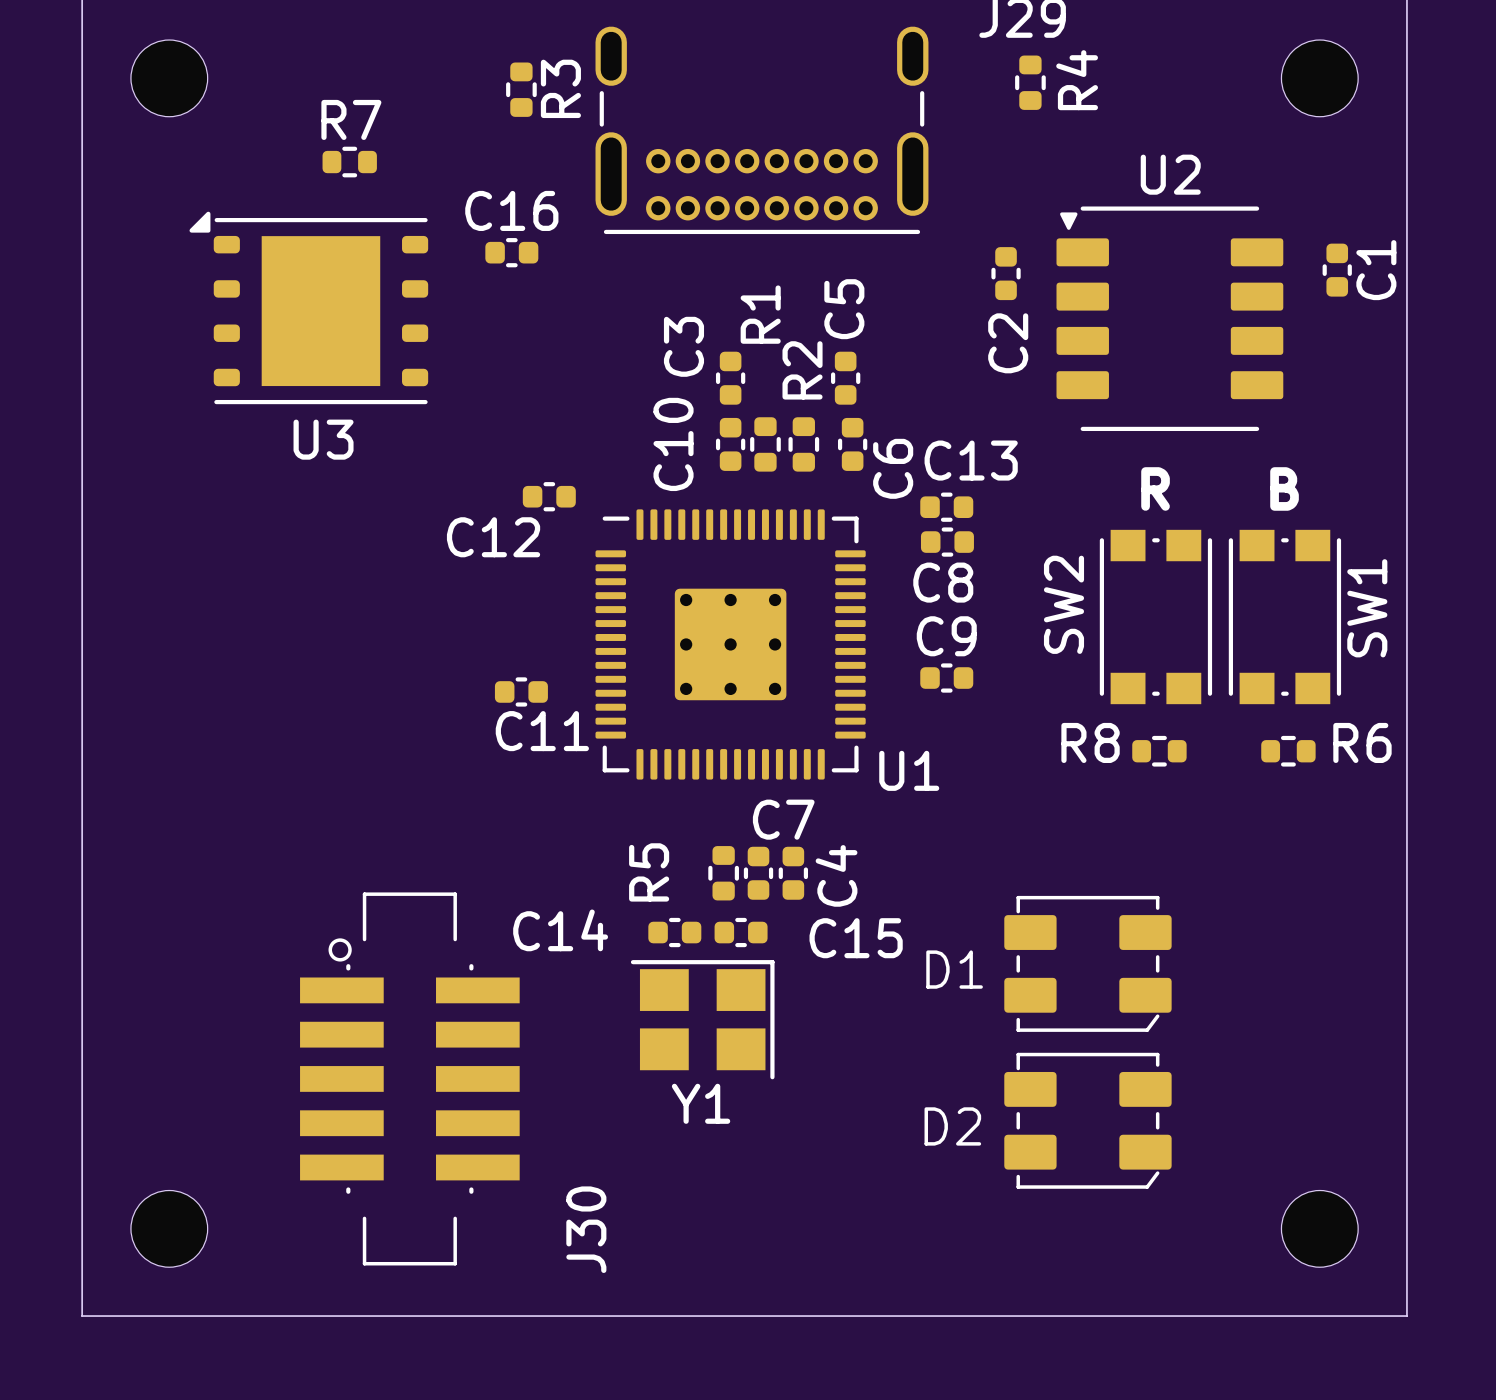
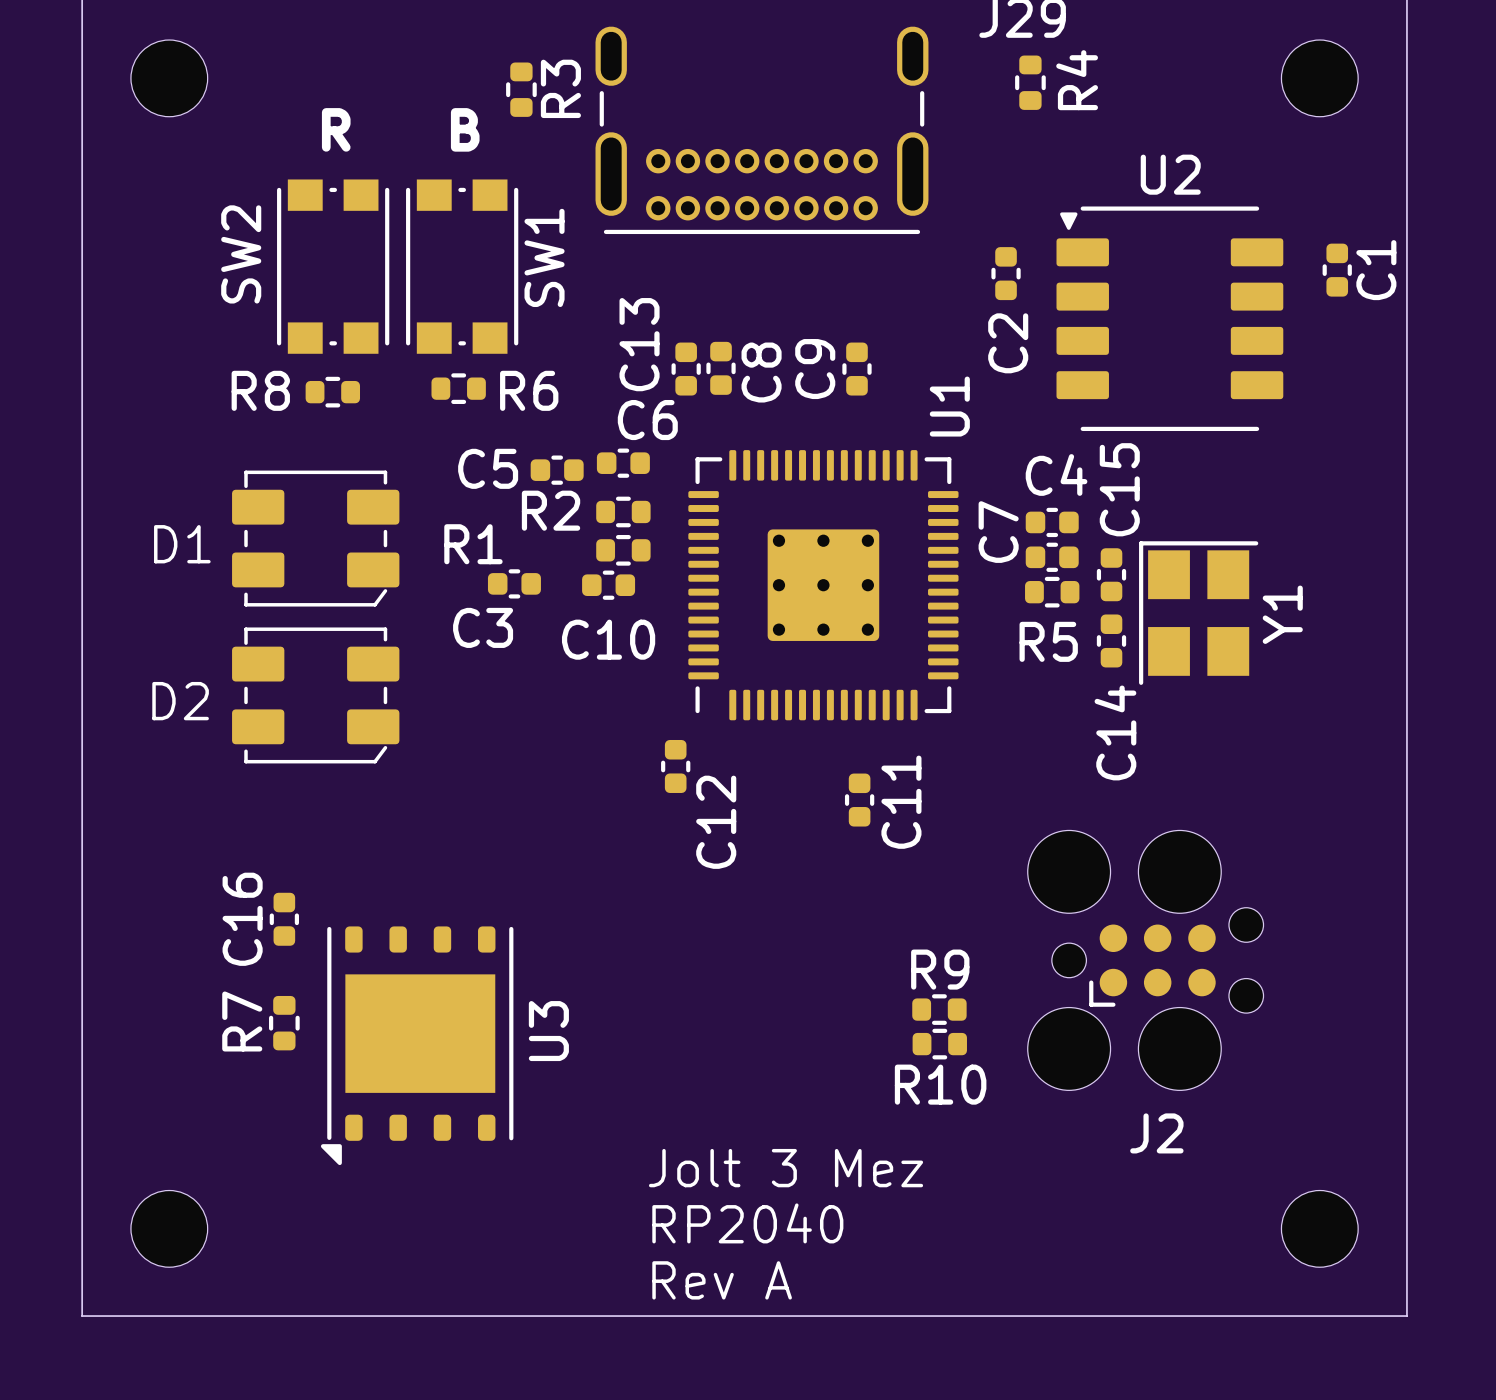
text: none -> R (336, 129)
text: none -> B (465, 129)
R7 rotation: 0° (349, 162) -> 90° clockwise (284, 1023)
R7 position: (349, 162) -> (284, 1023)
C16 rotation: 0° (511, 252) -> 90° clockwise (284, 919)
C16 position: (511, 252) -> (284, 919)
U3 rotation: 0° (308, 307) -> 90° counterclockwise (417, 1045)
U3 position: (308, 307) -> (417, 1045)
C5 name position: C5 (844, 309) -> C5 (488, 468)
R1 name position: R1 (760, 314) -> R1 (473, 544)
C3 name position: C3 (683, 346) -> C3 (483, 627)
R2 name position: R2 (802, 370) -> R2 (551, 510)
C3 rotation: 0° (730, 378) -> 90° clockwise (514, 583)
C3 position: (730, 378) -> (514, 583)
C5 rotation: 0° (845, 378) -> 90° clockwise (557, 470)
C5 position: (845, 378) -> (557, 470)
C10 name position: C10 (673, 444) -> C10 (608, 639)
C10 rotation: 0° (730, 444) -> 90° clockwise (608, 585)
C10 position: (730, 444) -> (608, 585)
R1 rotation: 0° (765, 444) -> 90° clockwise (623, 550)
R1 position: (765, 444) -> (623, 550)
R2 rotation: 0° (803, 444) -> 90° clockwise (623, 511)
R2 position: (803, 444) -> (623, 511)
C6 rotation: 0° (852, 444) -> 90° clockwise (623, 463)
C6 position: (852, 444) -> (623, 463)
C13 name position: C13 (971, 460) -> C13 (639, 344)
text: R (1155, 488) -> none
text: B (1284, 488) -> none
C12 rotation: 0° (549, 496) -> 90° clockwise (675, 766)
C12 position: (549, 496) -> (675, 766)
C13 rotation: 0° (946, 507) -> 90° clockwise (686, 369)
C13 position: (946, 507) -> (686, 369)
C12 name position: C12 (493, 537) -> C12 (716, 822)
C8 rotation: 0° (947, 542) -> 90° clockwise (721, 368)
C8 position: (947, 542) -> (721, 368)
SW2 position: (1155, 617) -> (333, 266)
SW1 position: (1284, 617) -> (462, 266)
U1 rotation: 0° (730, 644) -> 90° counterclockwise (823, 585)
C9 rotation: 0° (946, 678) -> 90° clockwise (856, 369)
C9 position: (946, 678) -> (856, 369)
C11 rotation: 0° (521, 691) -> 90° clockwise (859, 800)
C11 position: (521, 691) -> (859, 800)
R8 name position: R8 (1090, 742) -> R8 (260, 390)
R6 name position: R6 (1362, 742) -> R6 (529, 390)
R8 position: (1159, 751) -> (332, 392)
R6 position: (1288, 751) -> (458, 388)
C7 name position: C7 (783, 819) -> C7 (998, 532)
R5 name position: R5 (649, 872) -> R5 (1048, 641)
R5 rotation: 0° (723, 873) -> 90° clockwise (1052, 592)
R5 position: (723, 873) -> (1052, 592)
C7 rotation: 0° (758, 873) -> 90° clockwise (1052, 557)
C7 position: (758, 873) -> (1052, 557)
C4 rotation: 0° (793, 873) -> 90° clockwise (1052, 522)
C4 position: (793, 873) -> (1052, 522)
C14 name position: C14 (560, 930) -> C14 (1115, 732)
C14 rotation: 0° (674, 932) -> 90° clockwise (1111, 640)
C14 position: (674, 932) -> (1111, 640)
C15 rotation: 0° (741, 932) -> 90° clockwise (1111, 574)
C15 position: (741, 932) -> (1111, 574)
C15 name position: C15 (856, 938) -> C15 (1119, 489)
J2: none -> (1145, 960)
D1 position: (1087, 963) -> (315, 538)
R9: none -> (939, 1009)
Y1 rotation: 0° (702, 1019) -> 90° counterclockwise (1198, 613)
Y1 position: (702, 1019) -> (1198, 613)
R10: none -> (939, 1044)
J30: (409, 1078) -> none
D2 position: (1087, 1120) -> (315, 695)
text: none -> Jolt 3 Mez (786, 1168)
text: none -> RP2040 (747, 1223)
text: none -> Rev A (722, 1280)

